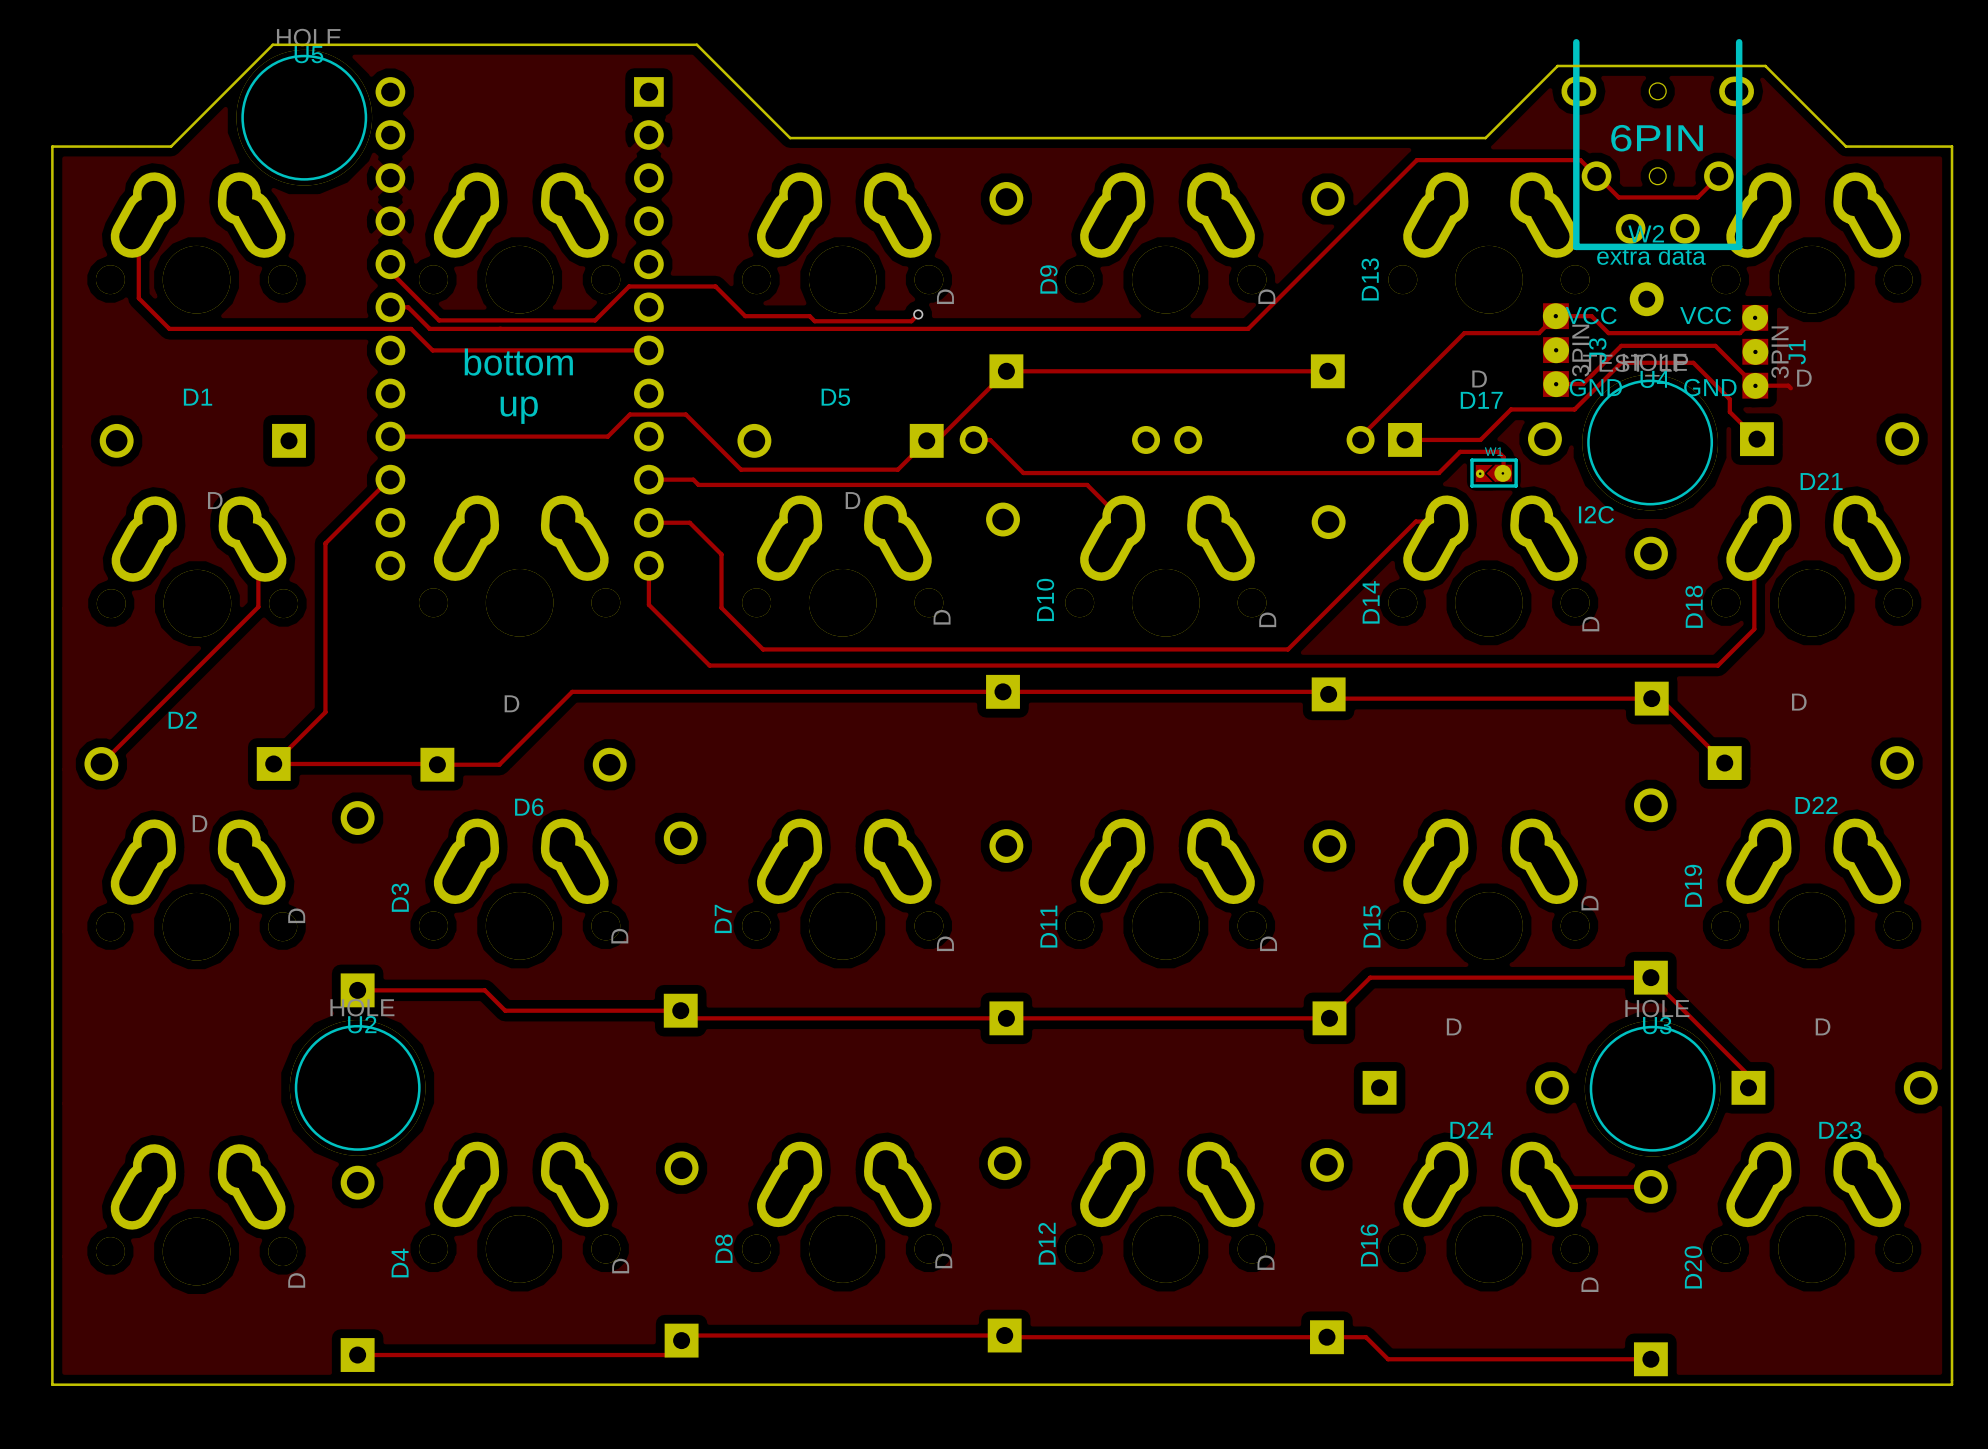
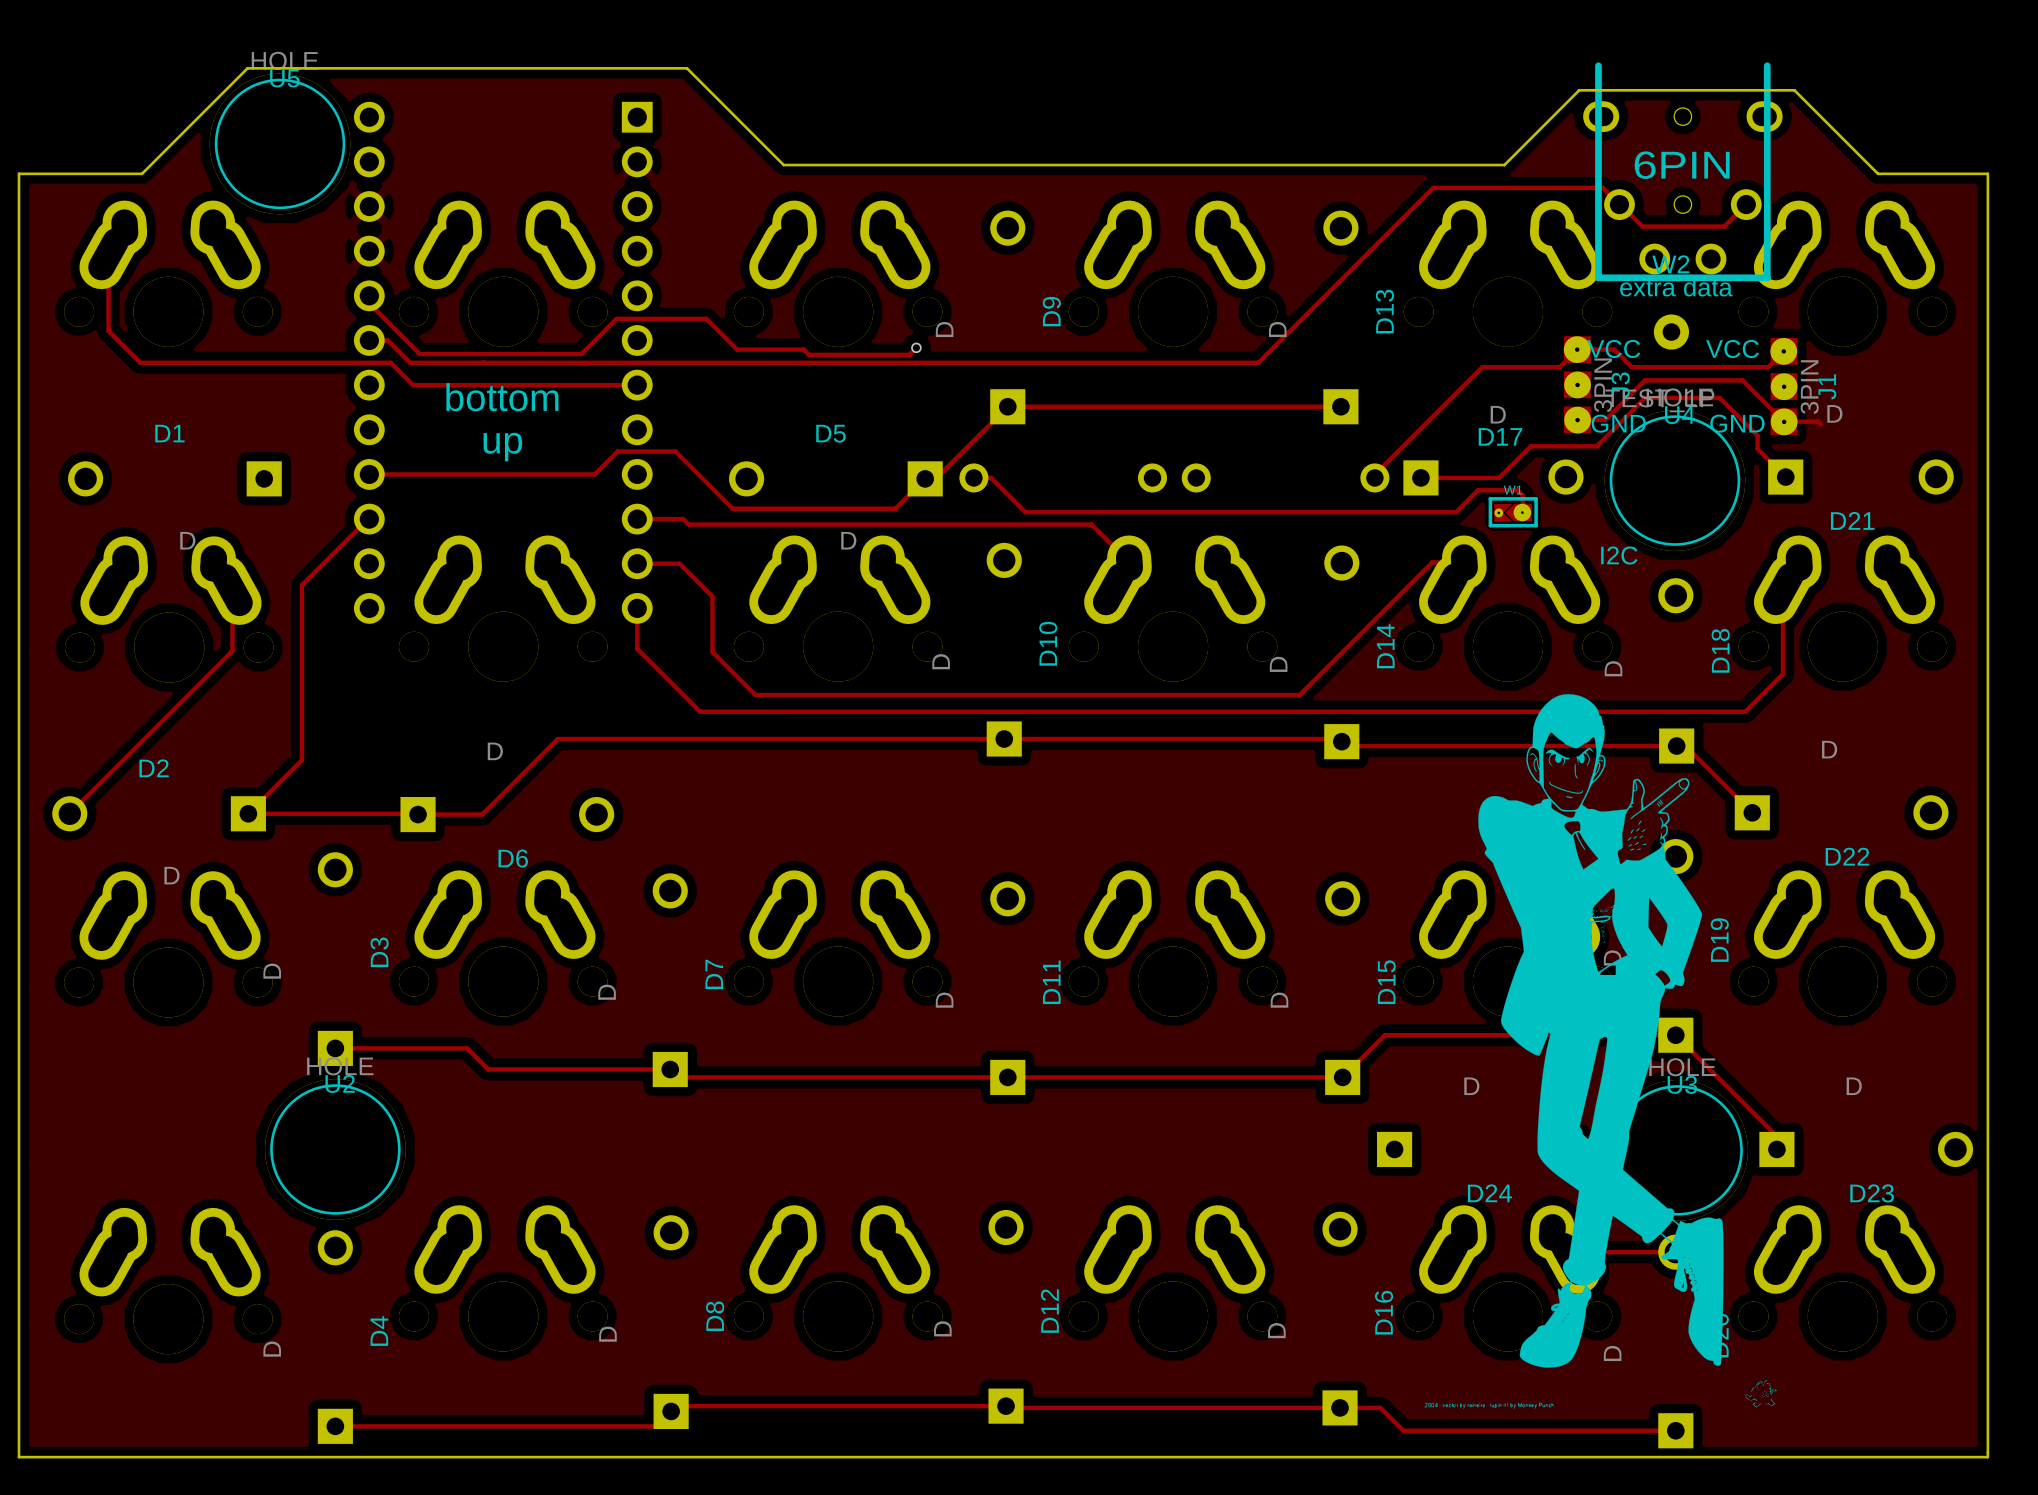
drawing: none -> [1424, 694, 1777, 1409]

